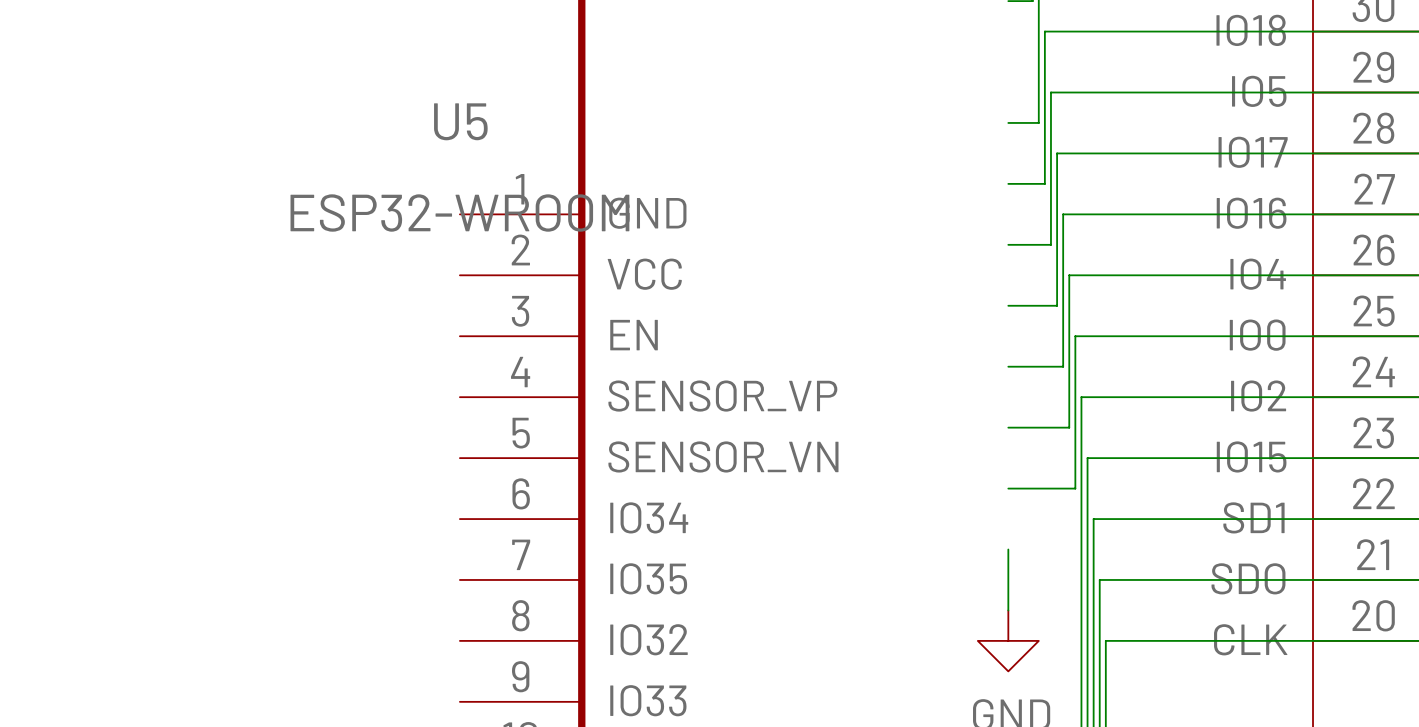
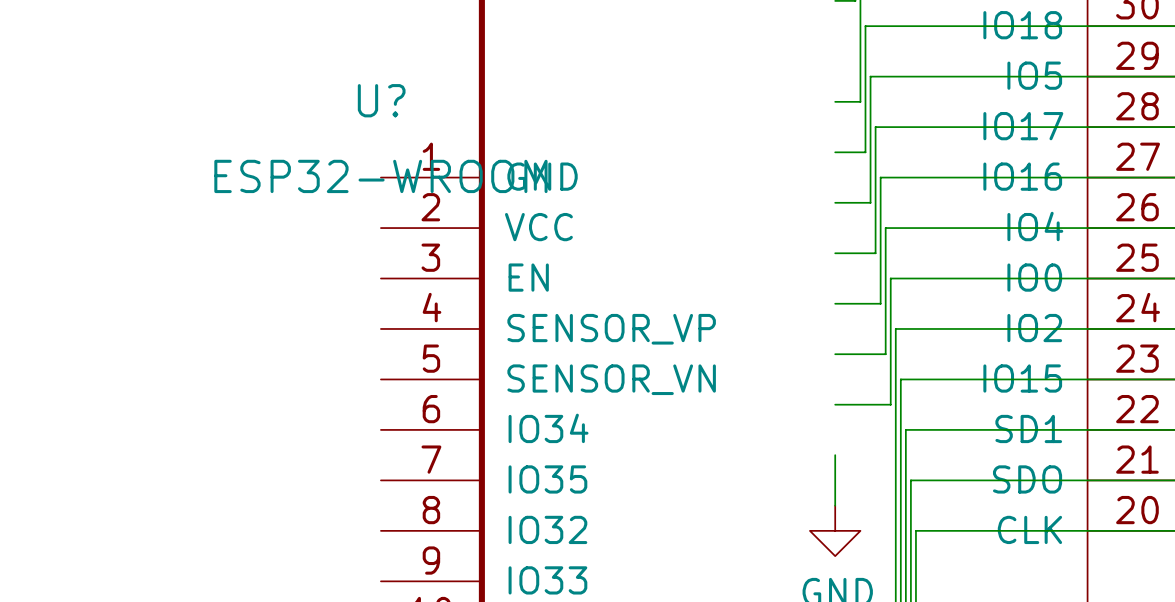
U5 name: U5 (460, 121) -> U? (381, 100)

